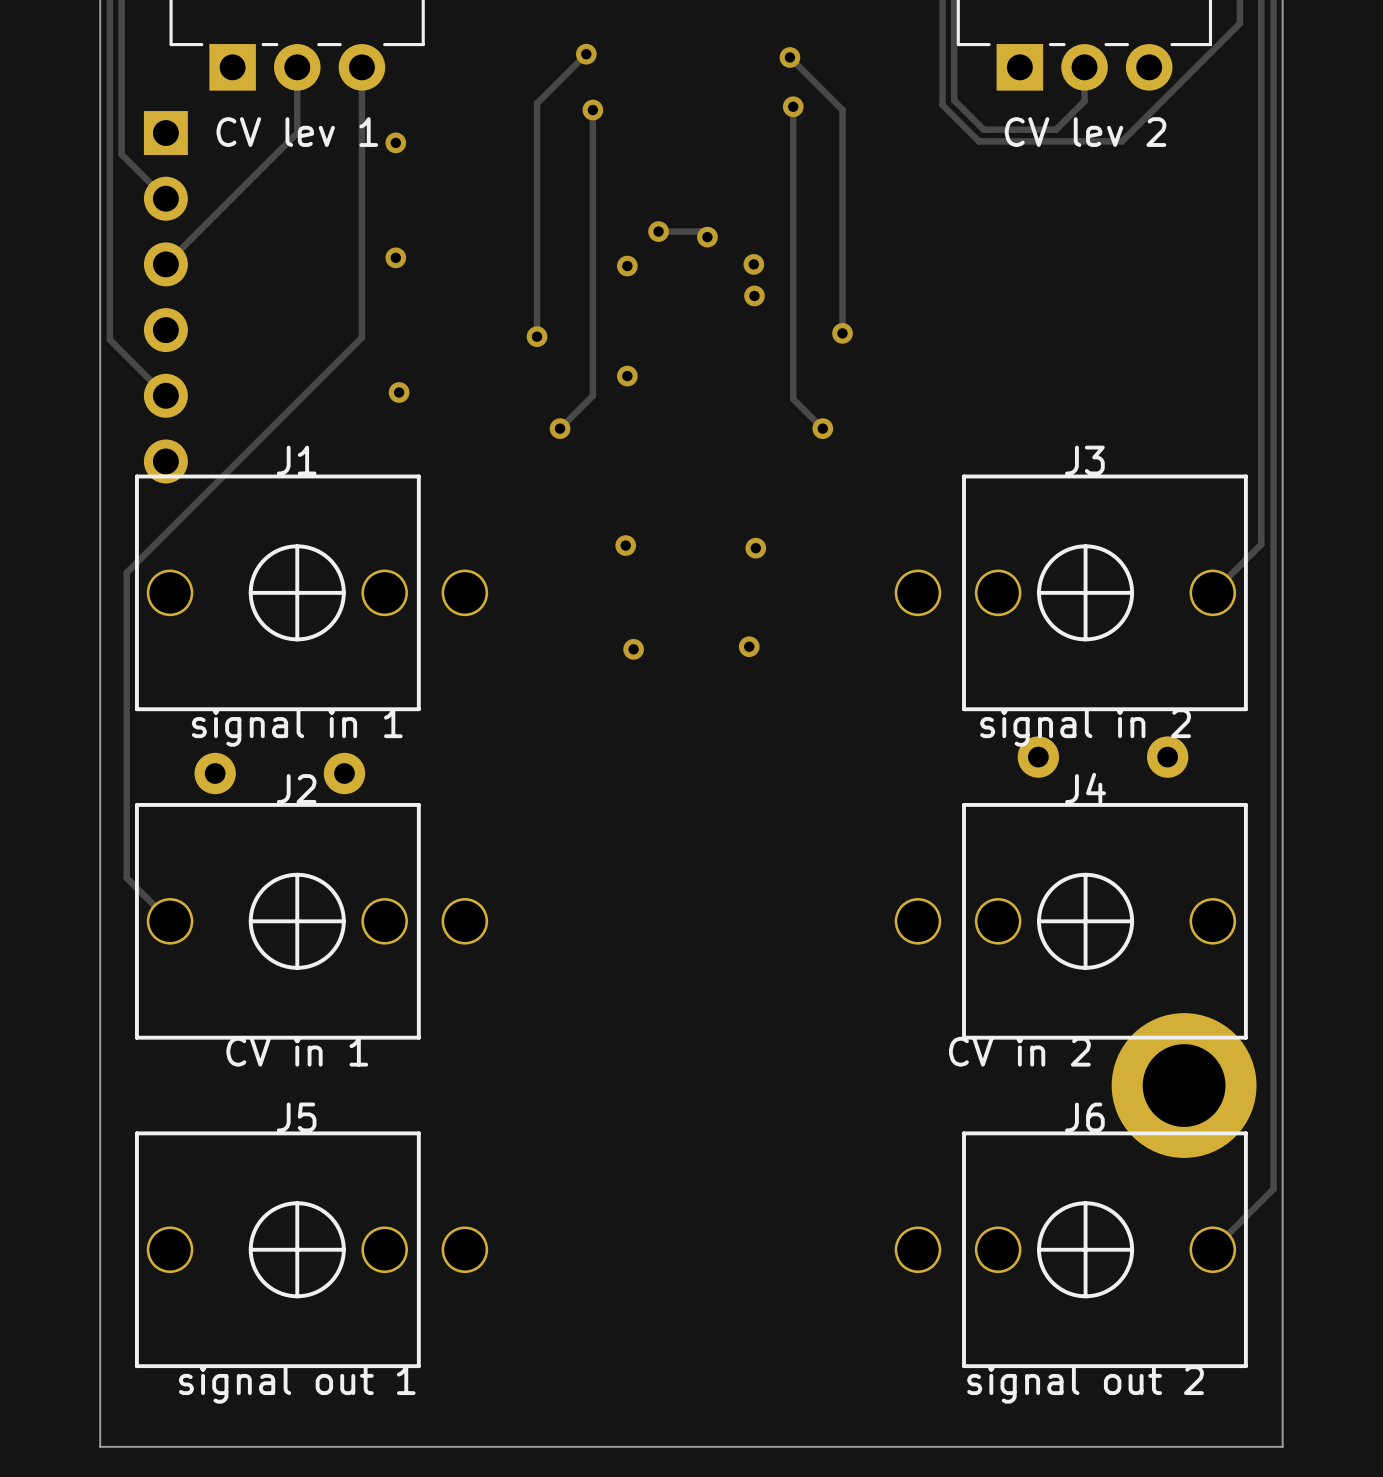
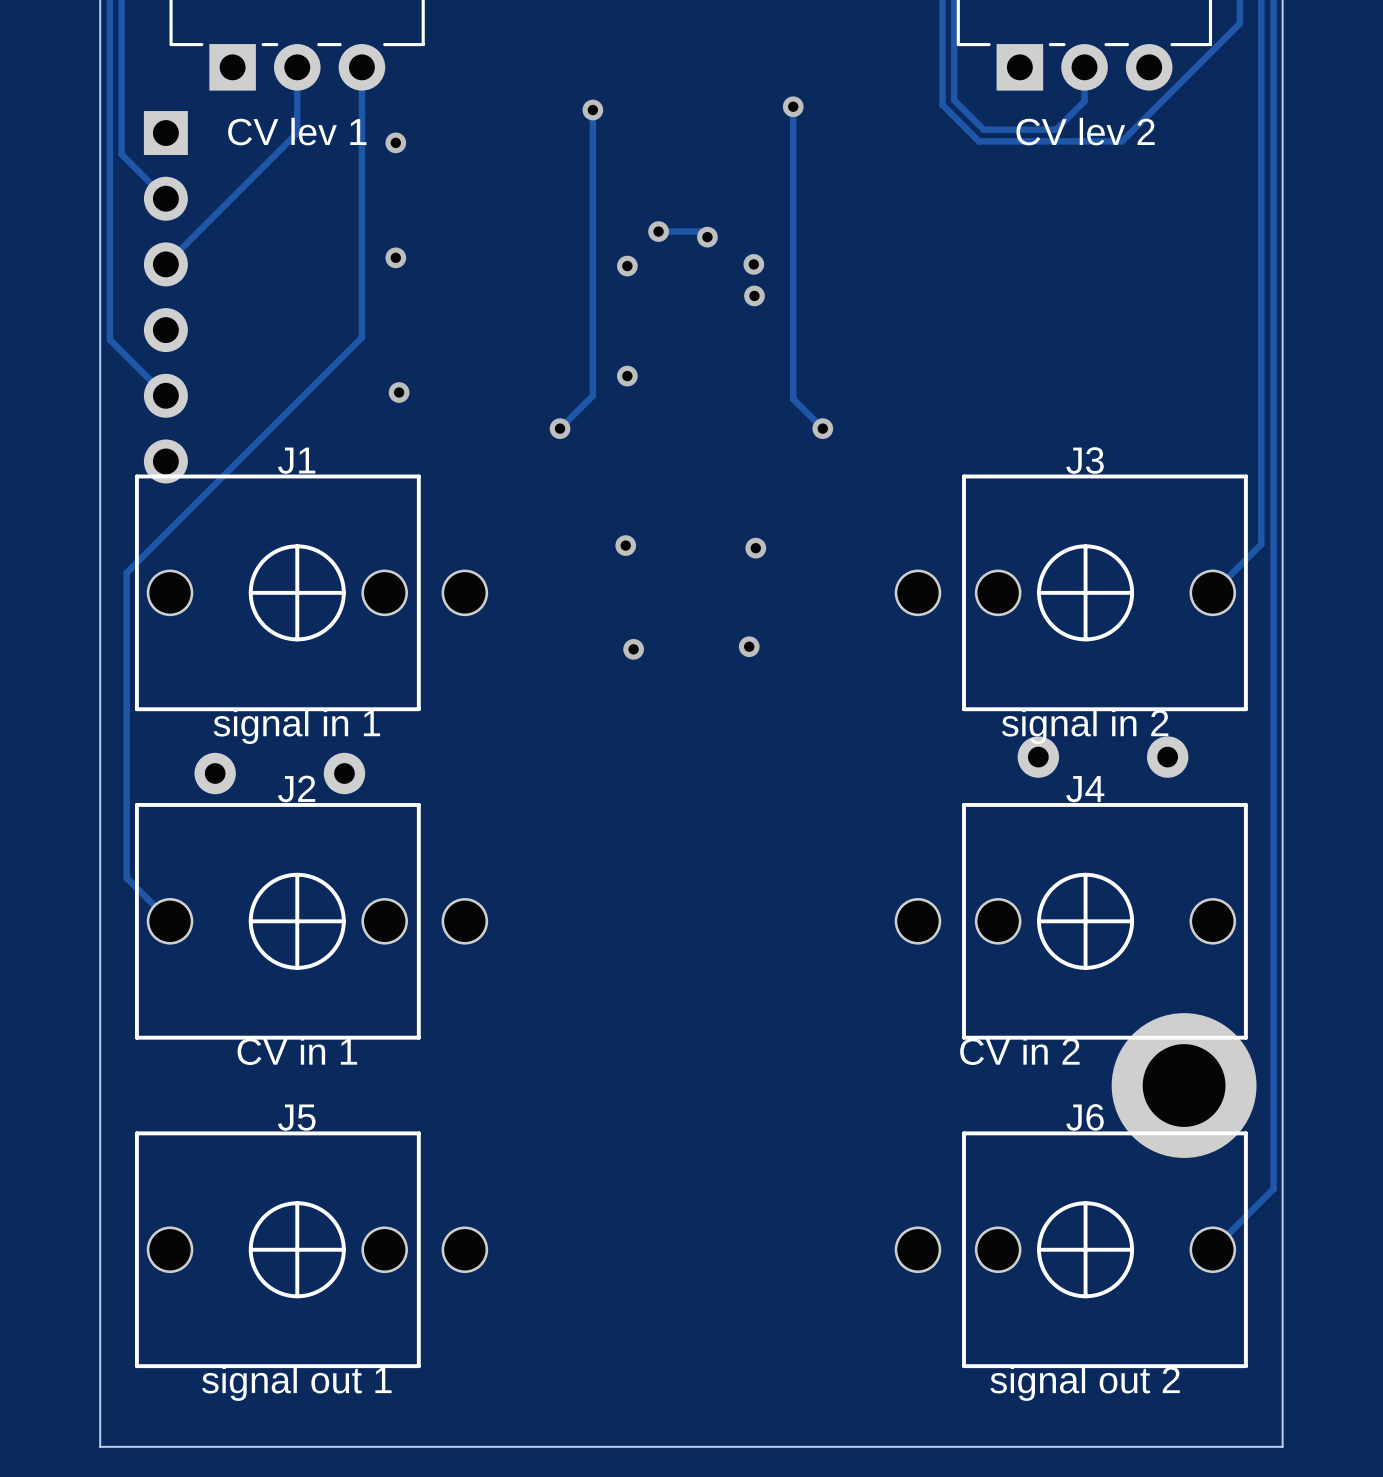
track: (586, 54) (537, 103) (537, 336) -> none
via: (586, 54) -> none
track: (789, 57) (842, 110) (842, 333) -> none
via: (789, 57) -> none
via: (842, 333) -> none
via: (537, 336) -> none

